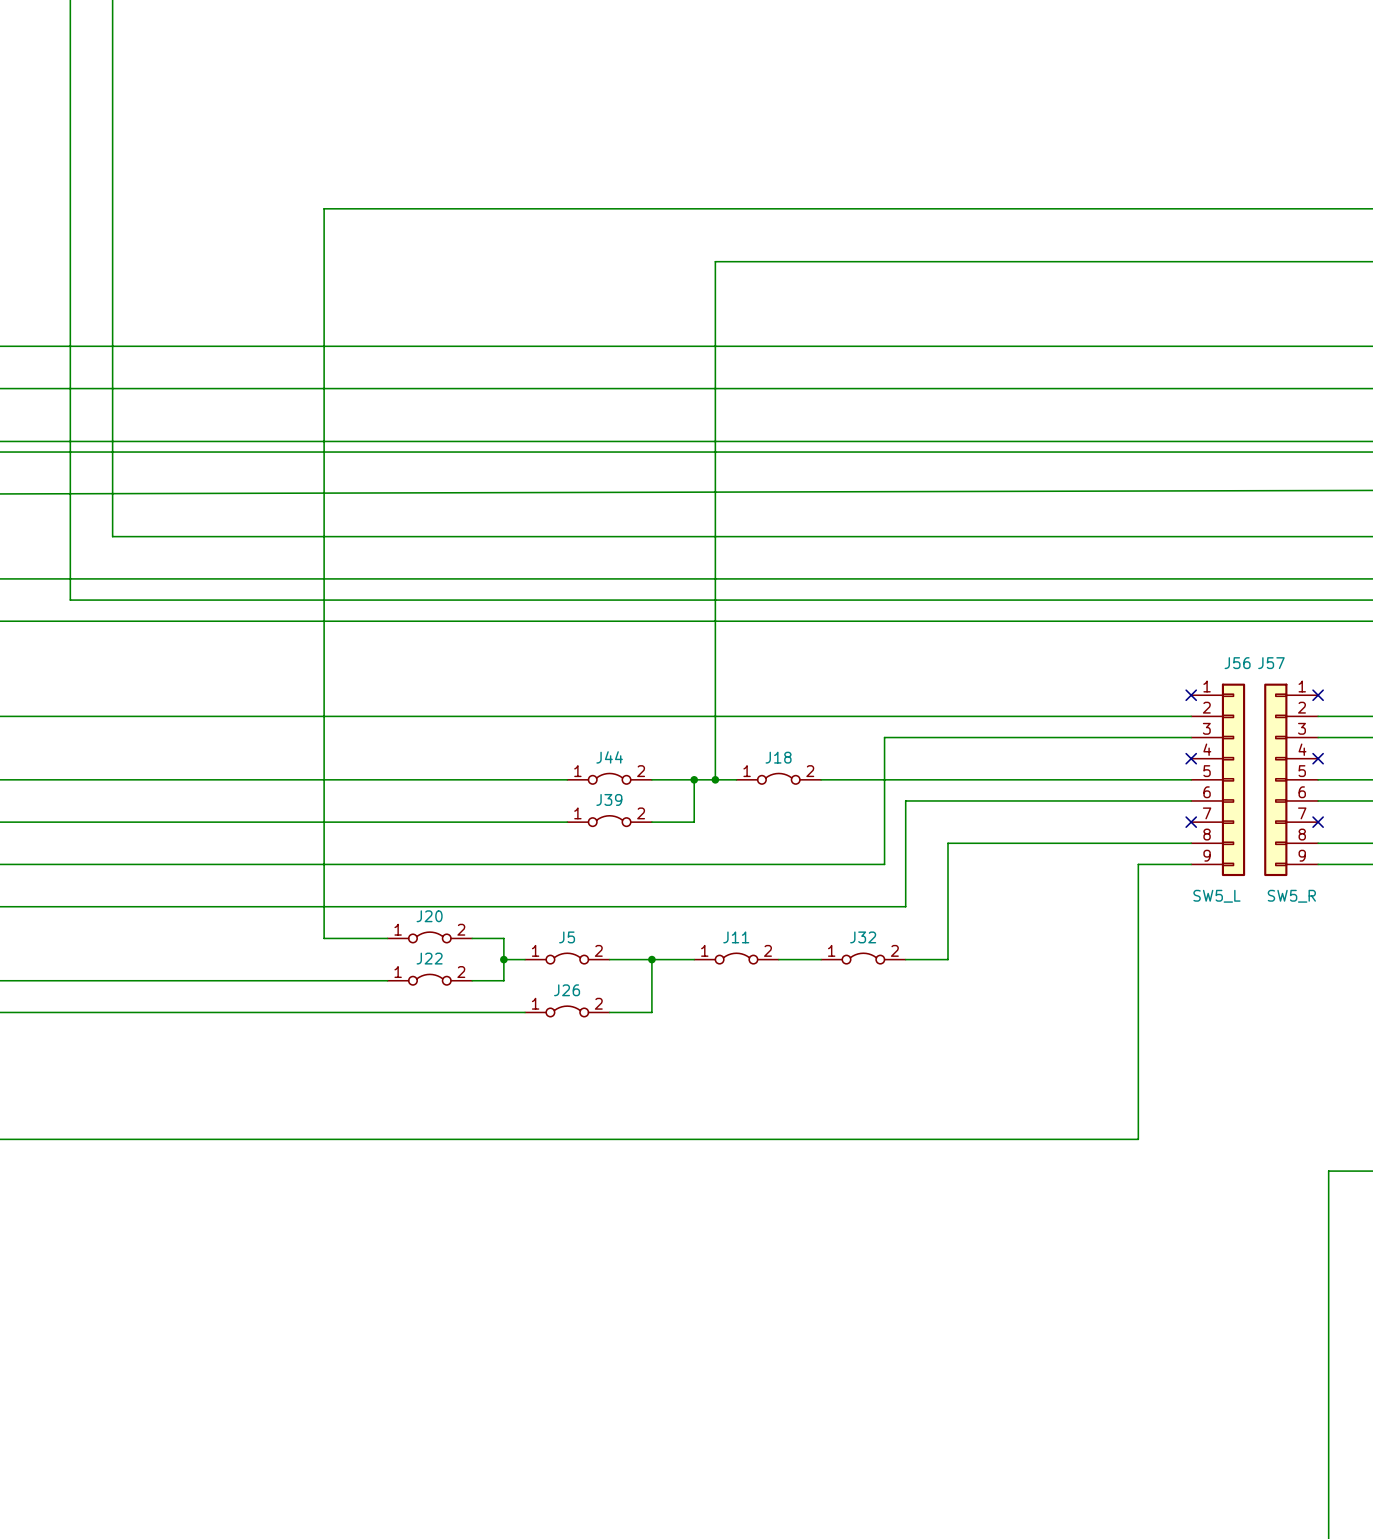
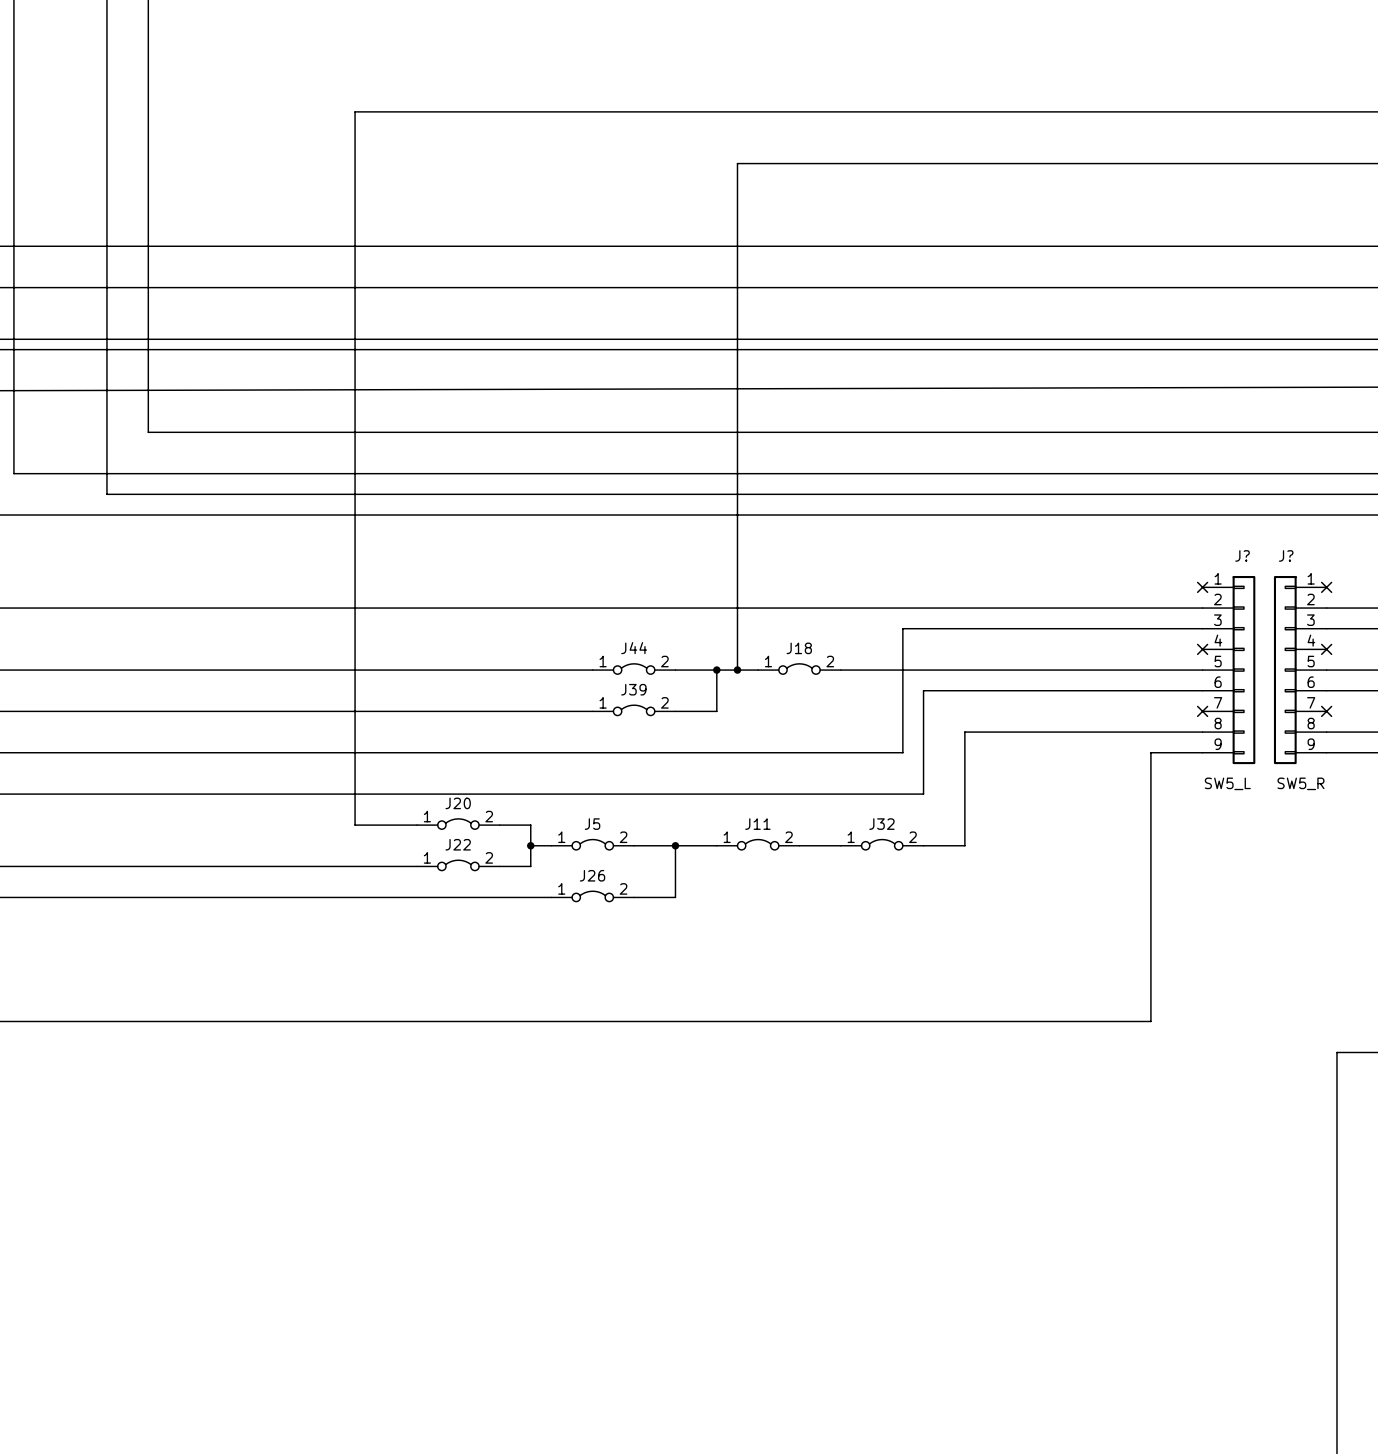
J56 name: J56 (1237, 663) -> J? (1242, 555)
J57 name: J57 (1271, 663) -> J? (1286, 555)

